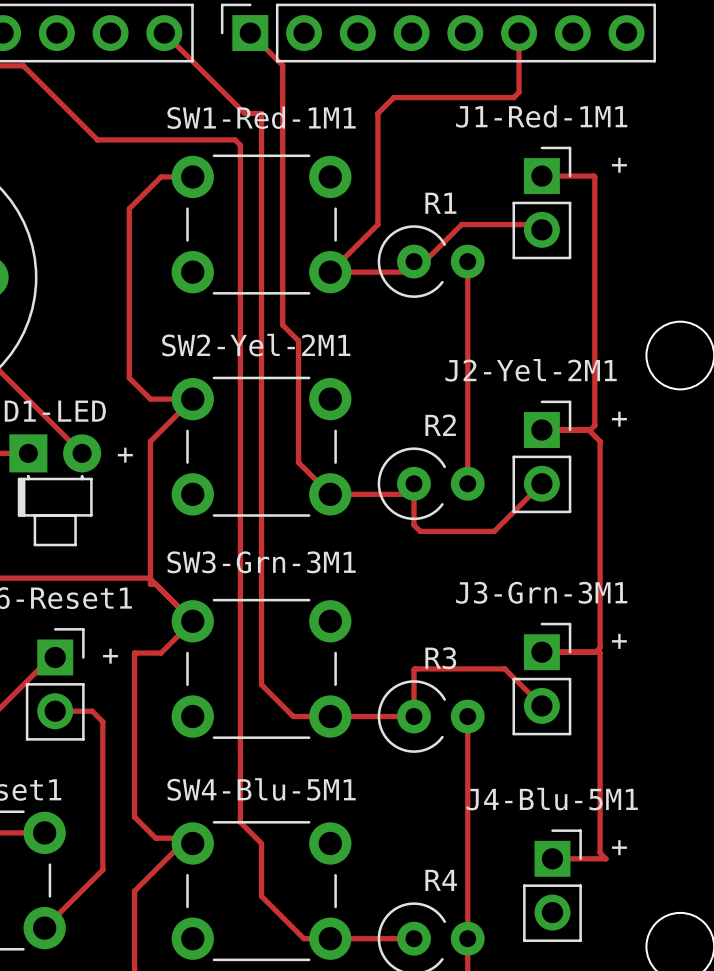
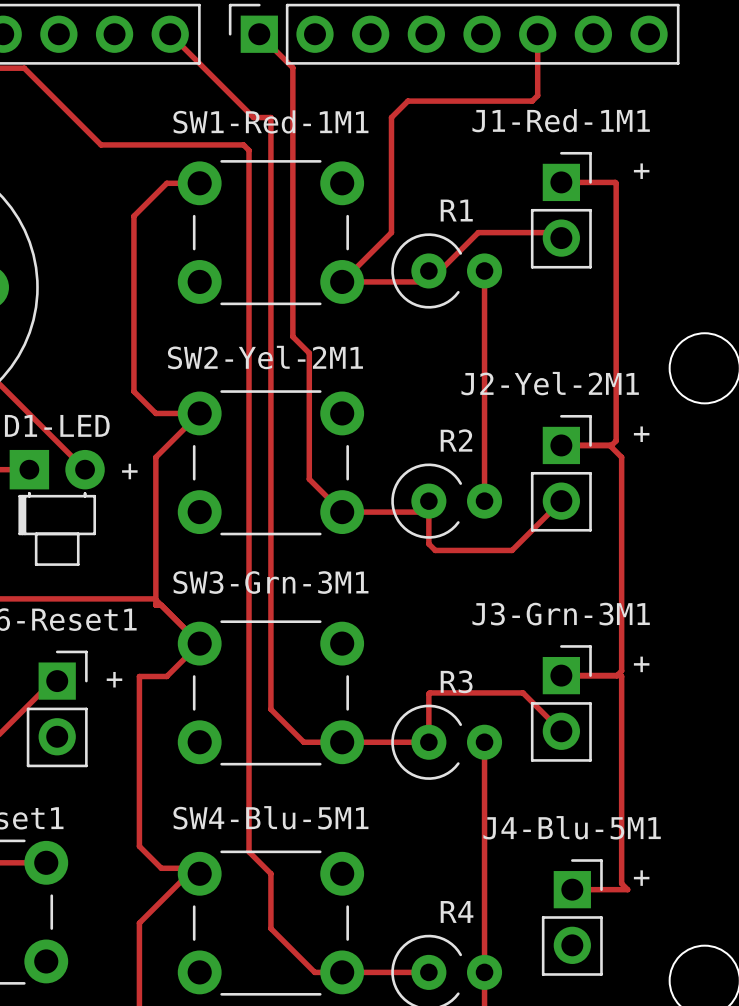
track: (55, 711) (92, 711) (102, 721) (102, 869) (44, 928) -> none

